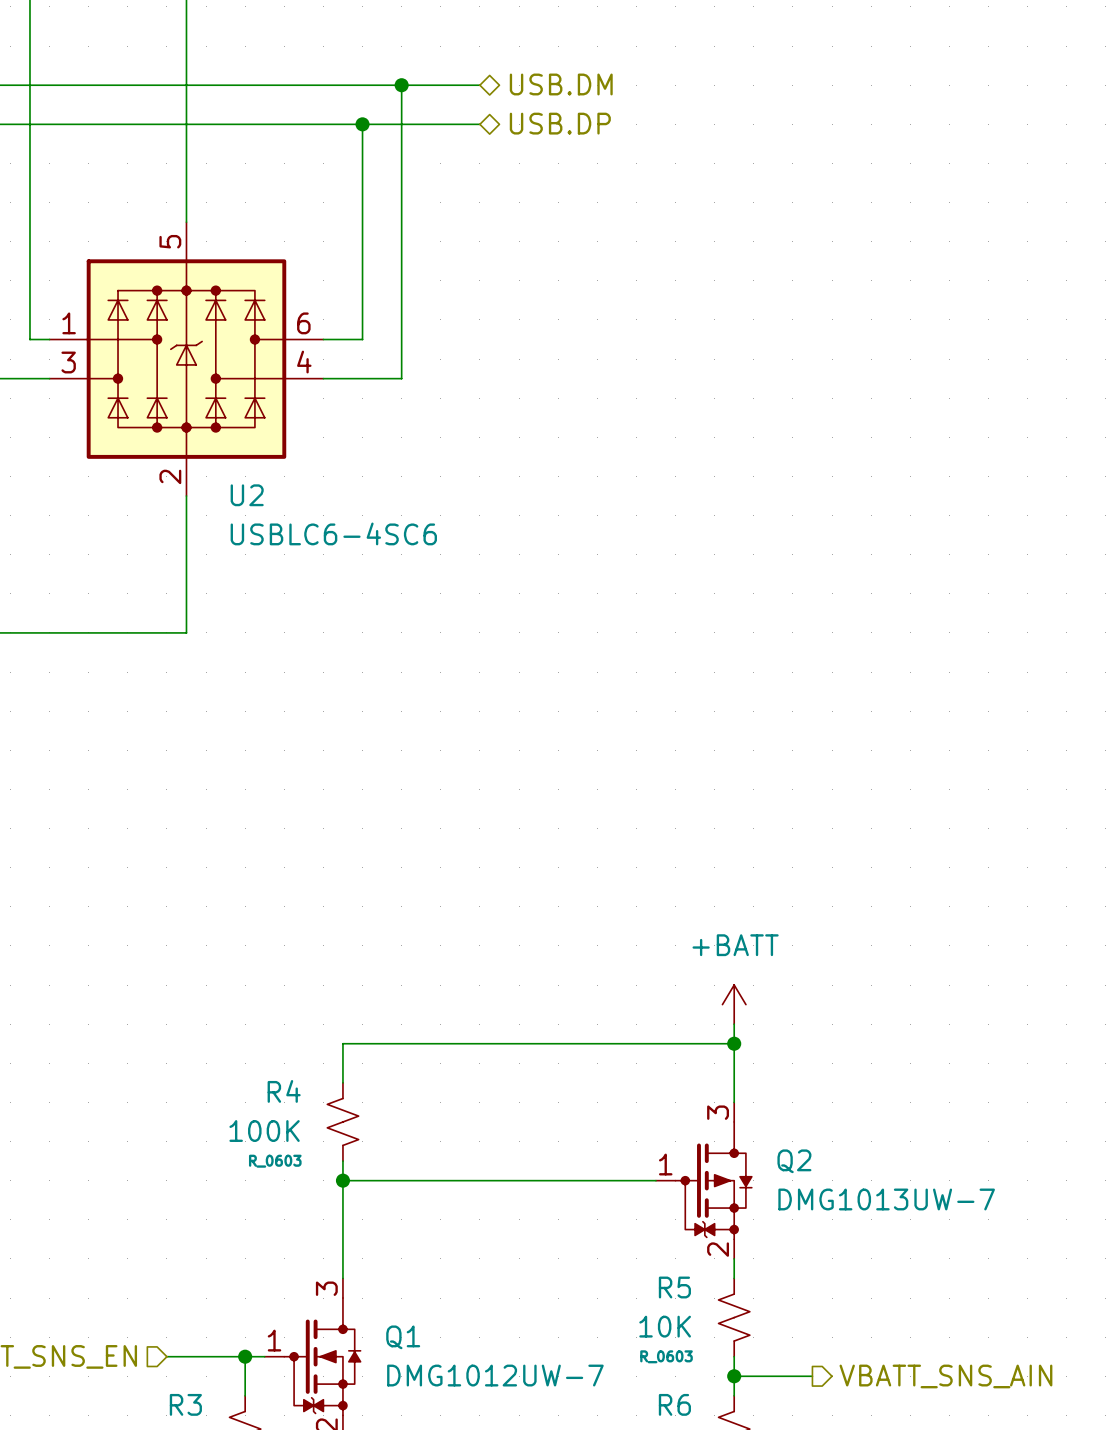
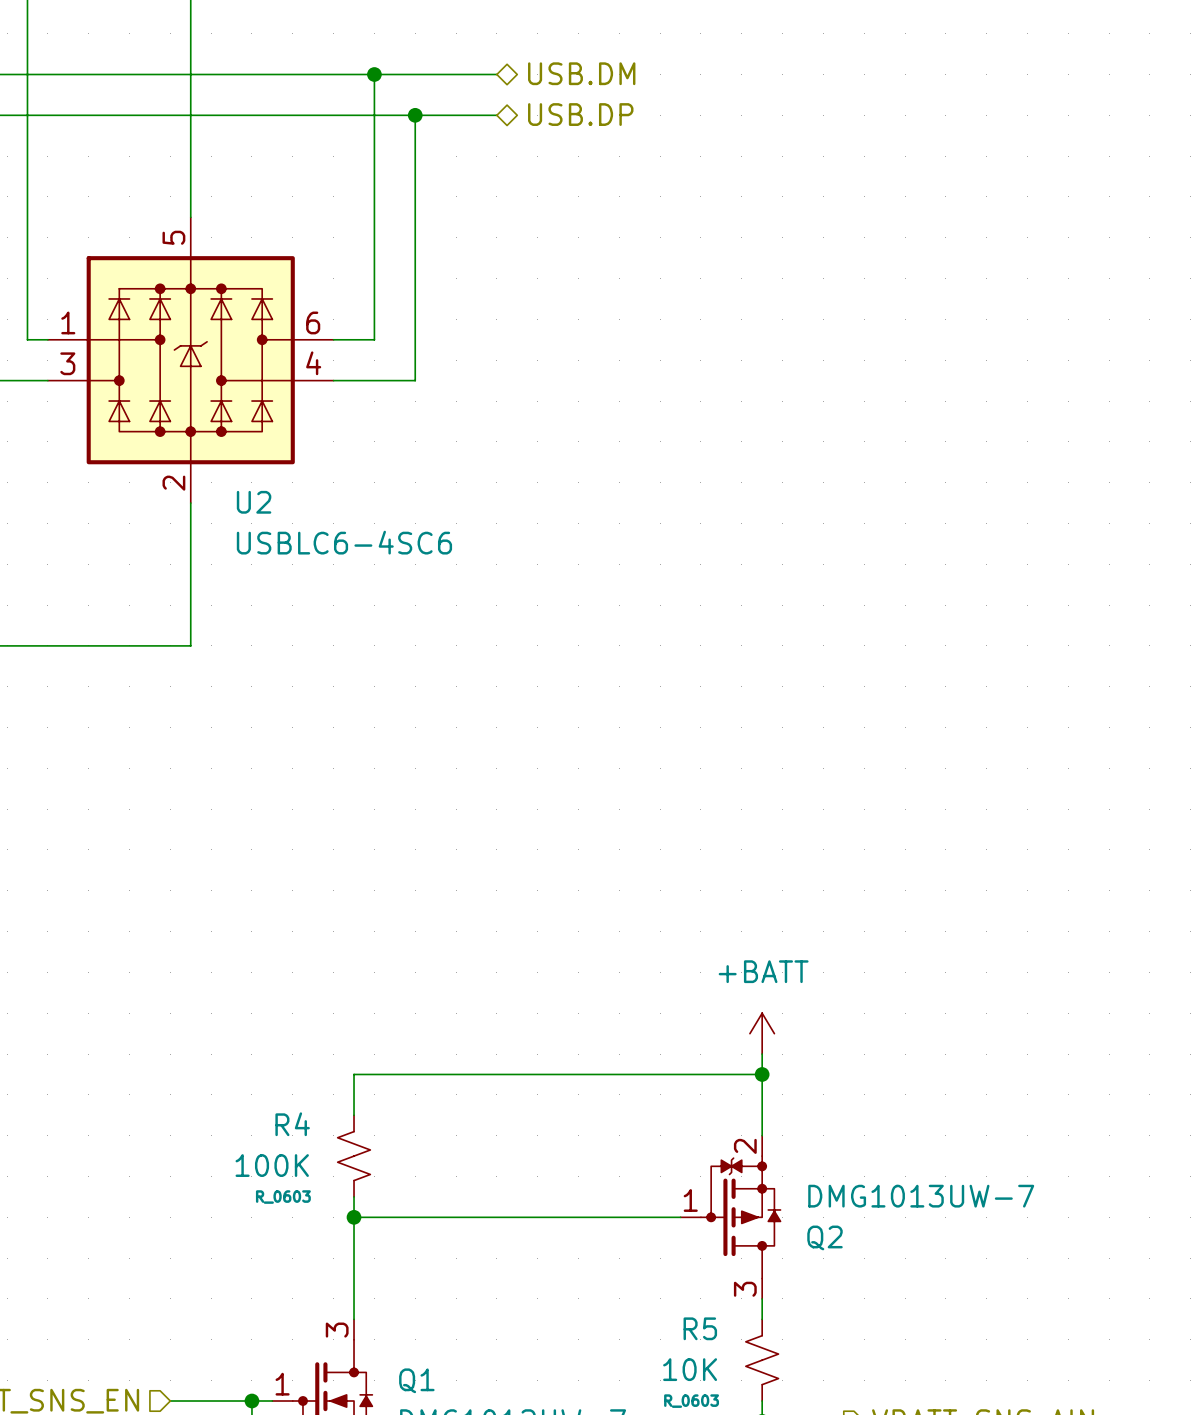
junction: none -> (374, 74)
wire: (401, 85) (401, 124) -> (374, 74) (374, 115)
junction: (401, 85) -> none
junction: (362, 124) -> none
junction: none -> (415, 115)
Q2 flip: as is (713, 1180) -> up-down (740, 1217)

